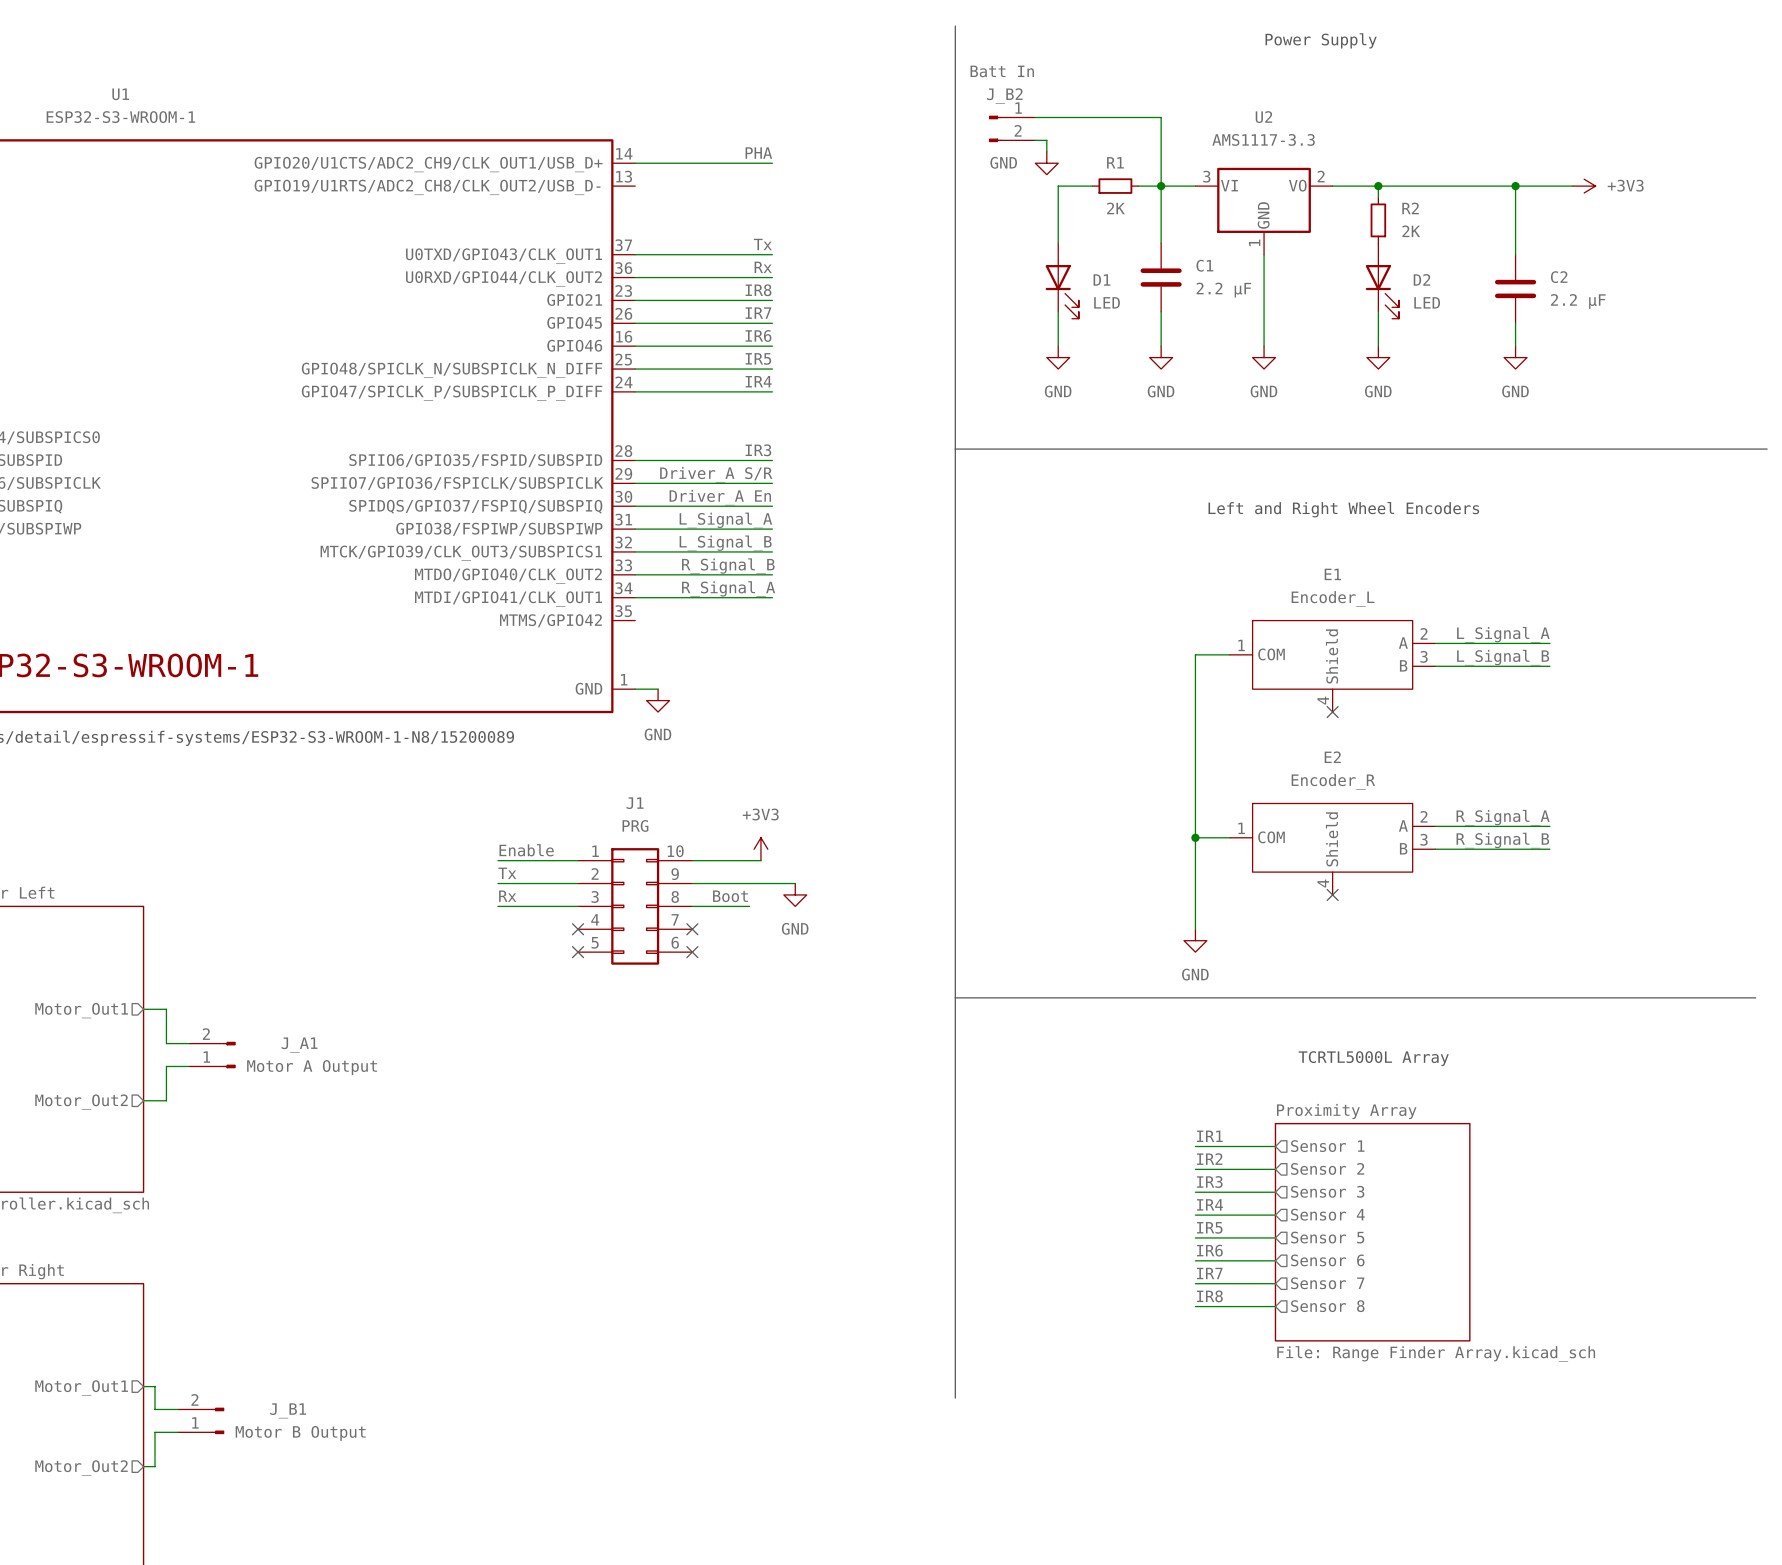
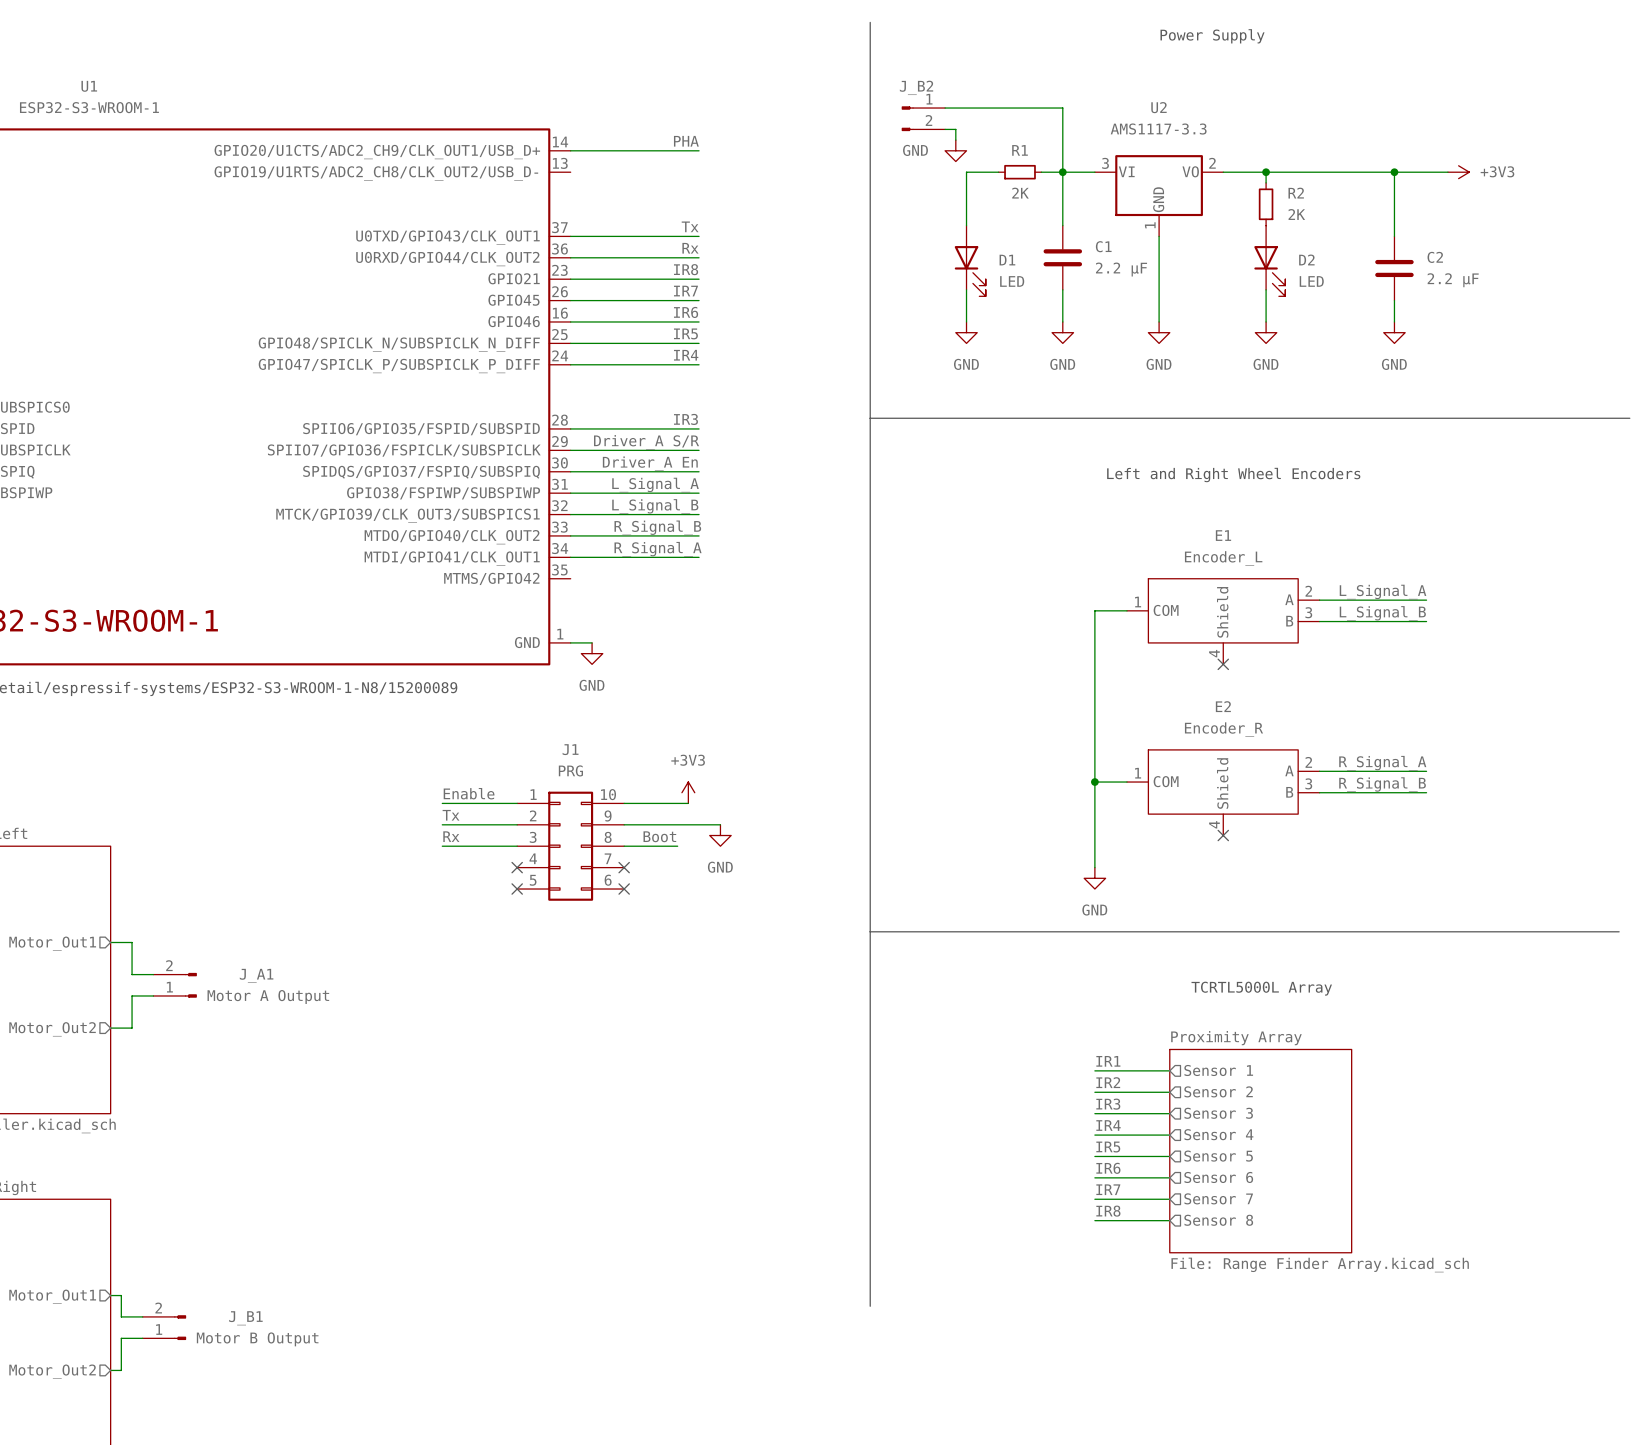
J_B2 value: Batt In (1002, 71) -> none

